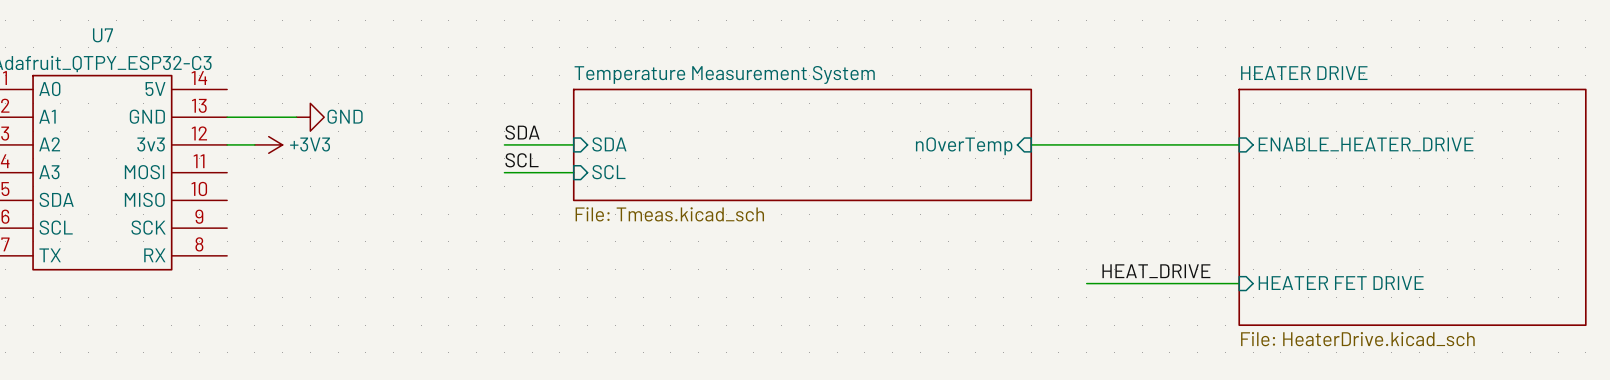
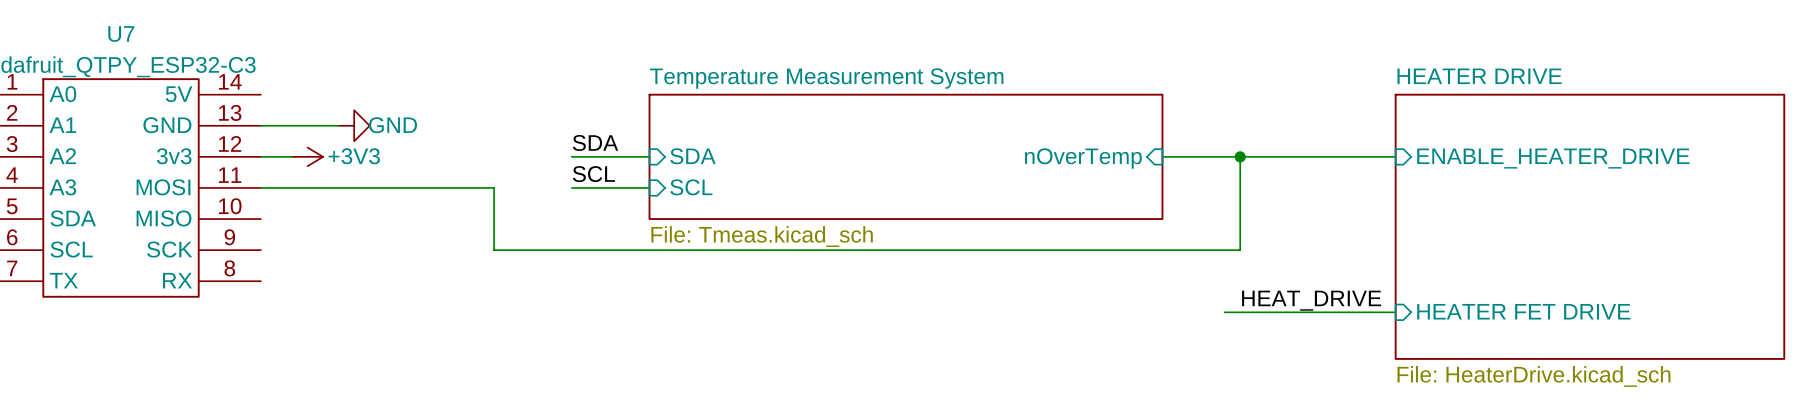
wire: none -> (1240, 156) (1240, 250) (494, 250) (494, 187) (260, 187)
junction: none -> (1240, 156)

